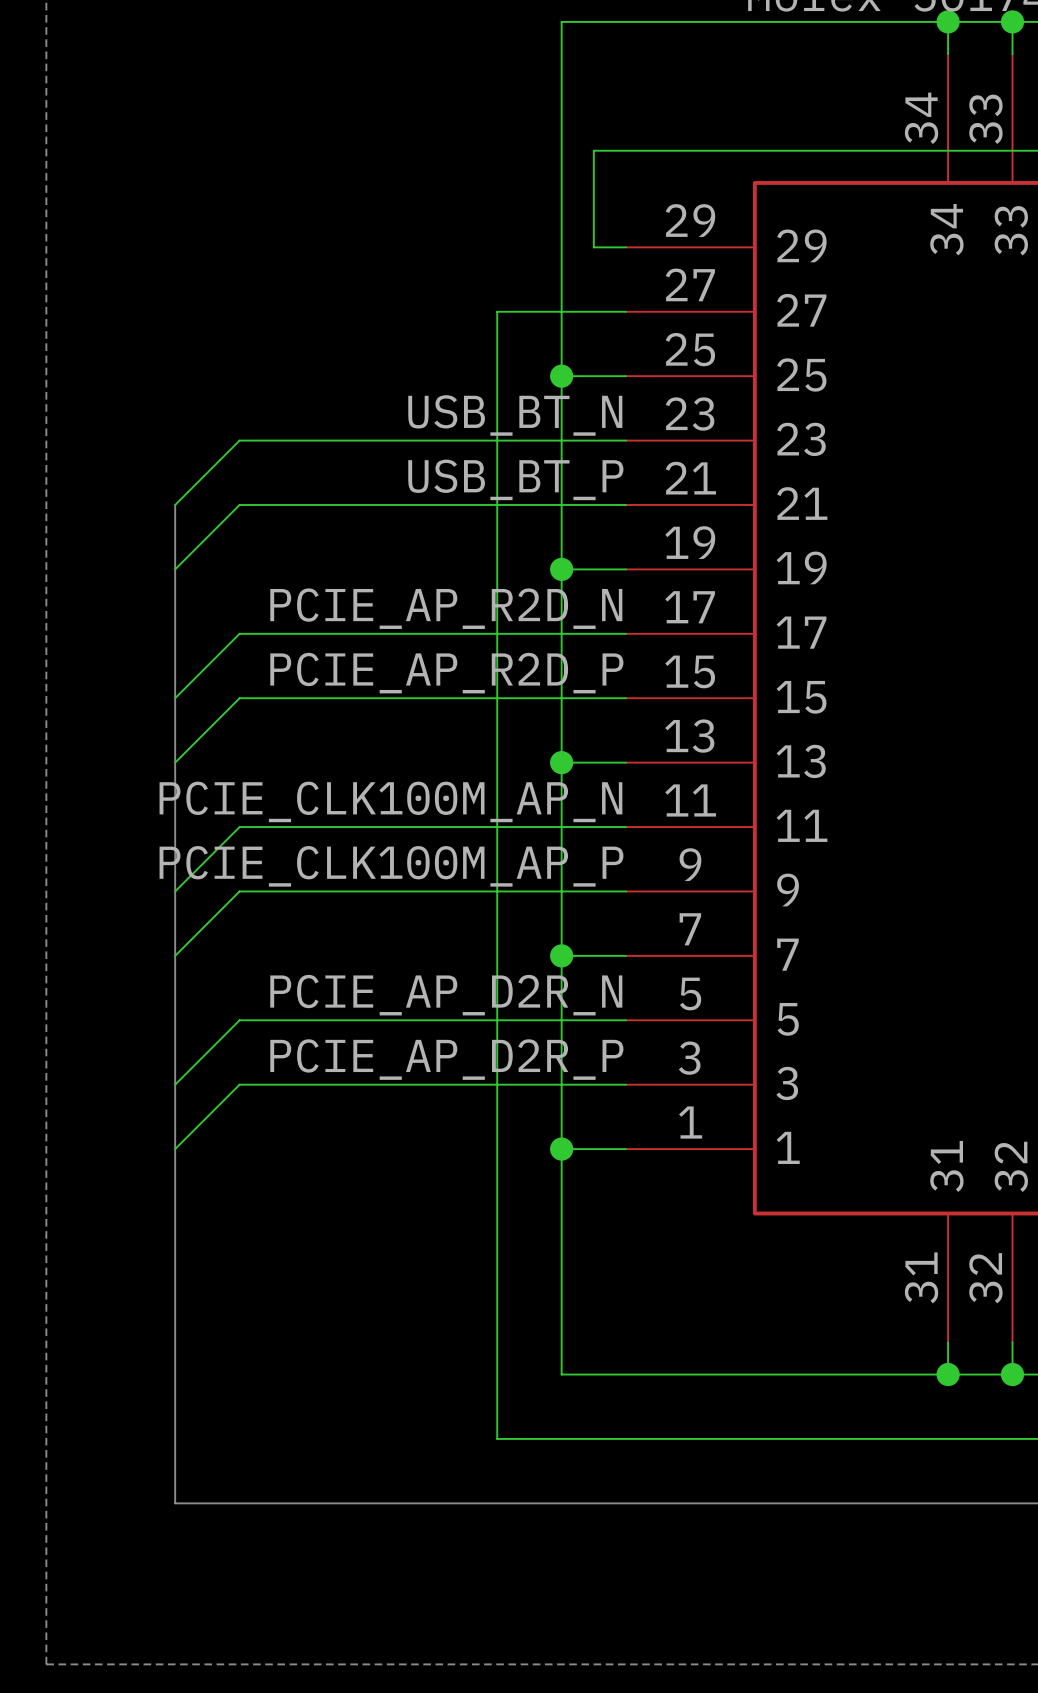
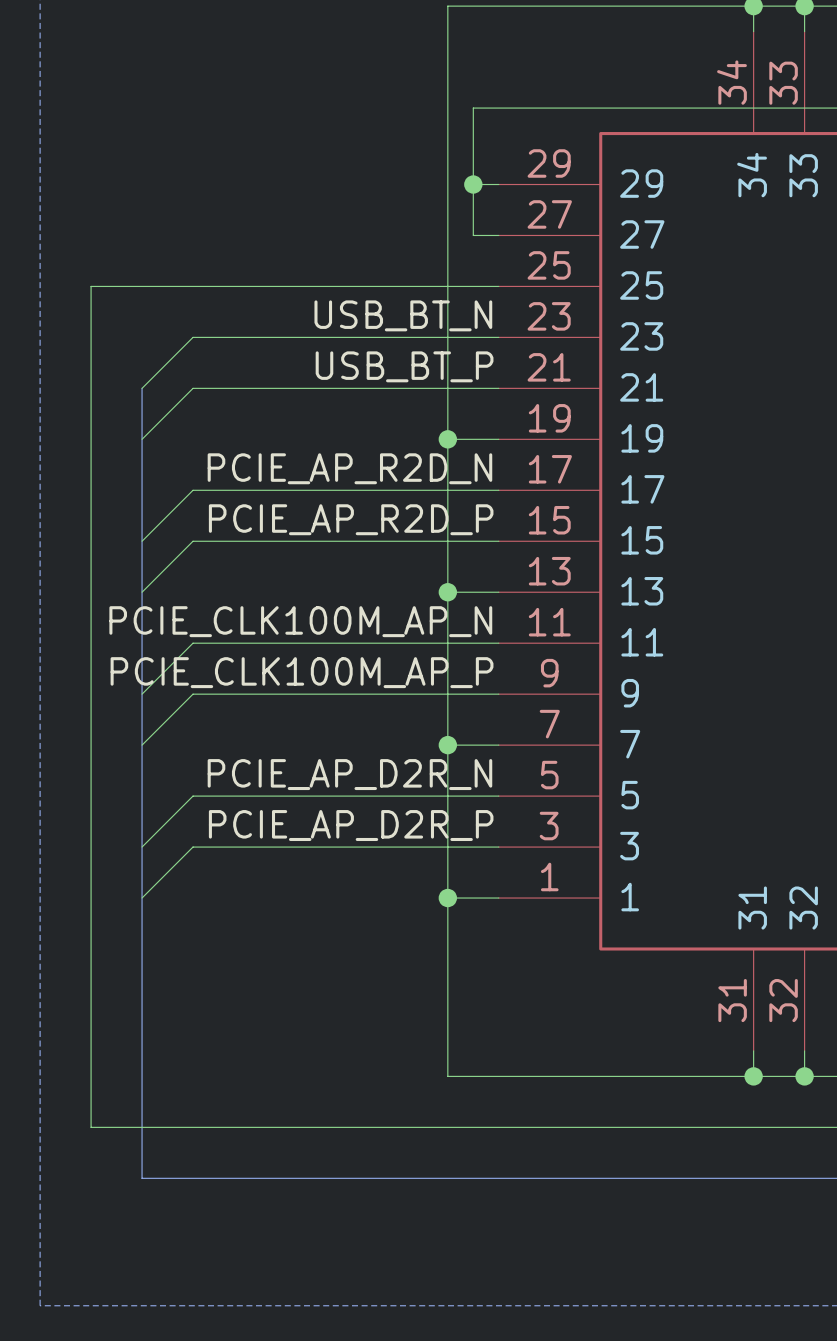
wire: none -> (473, 184) (473, 235)
wire: (593, 311) (497, 311) (497, 1438) -> (447, 286) (91, 286) (91, 1127) (396, 1127)
junction position: (561, 376) -> (473, 184)

